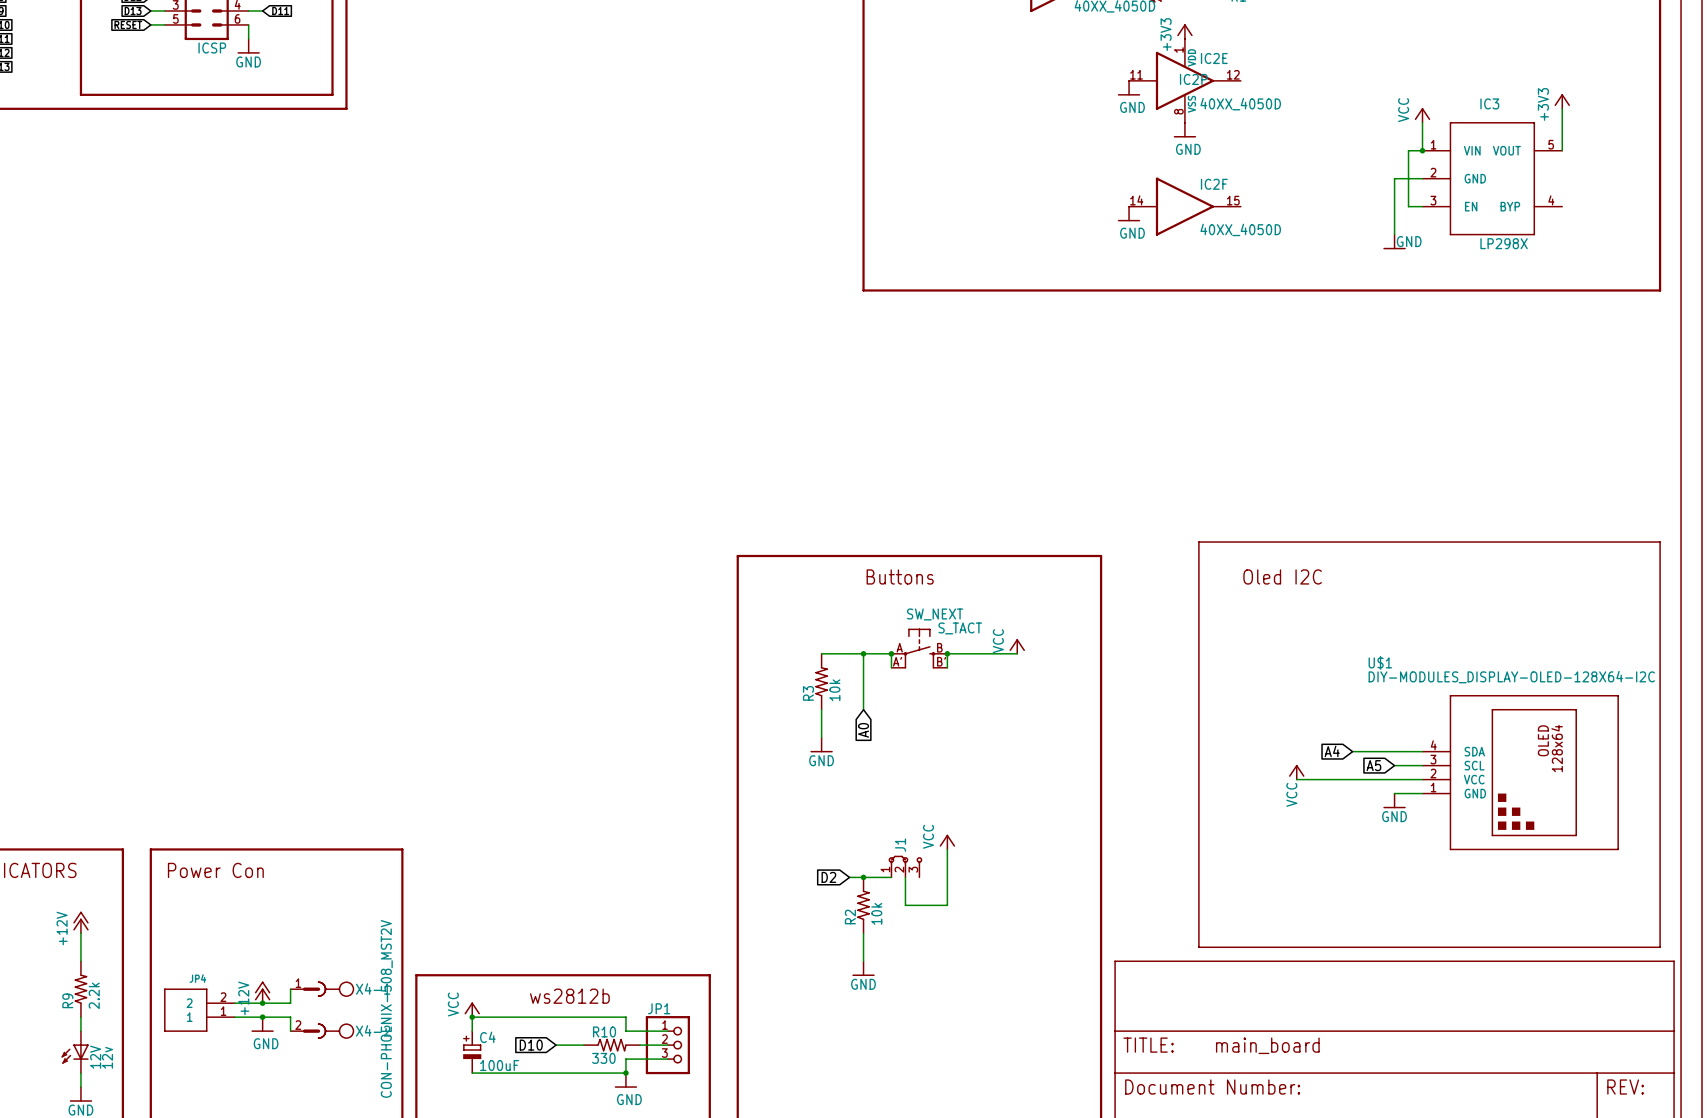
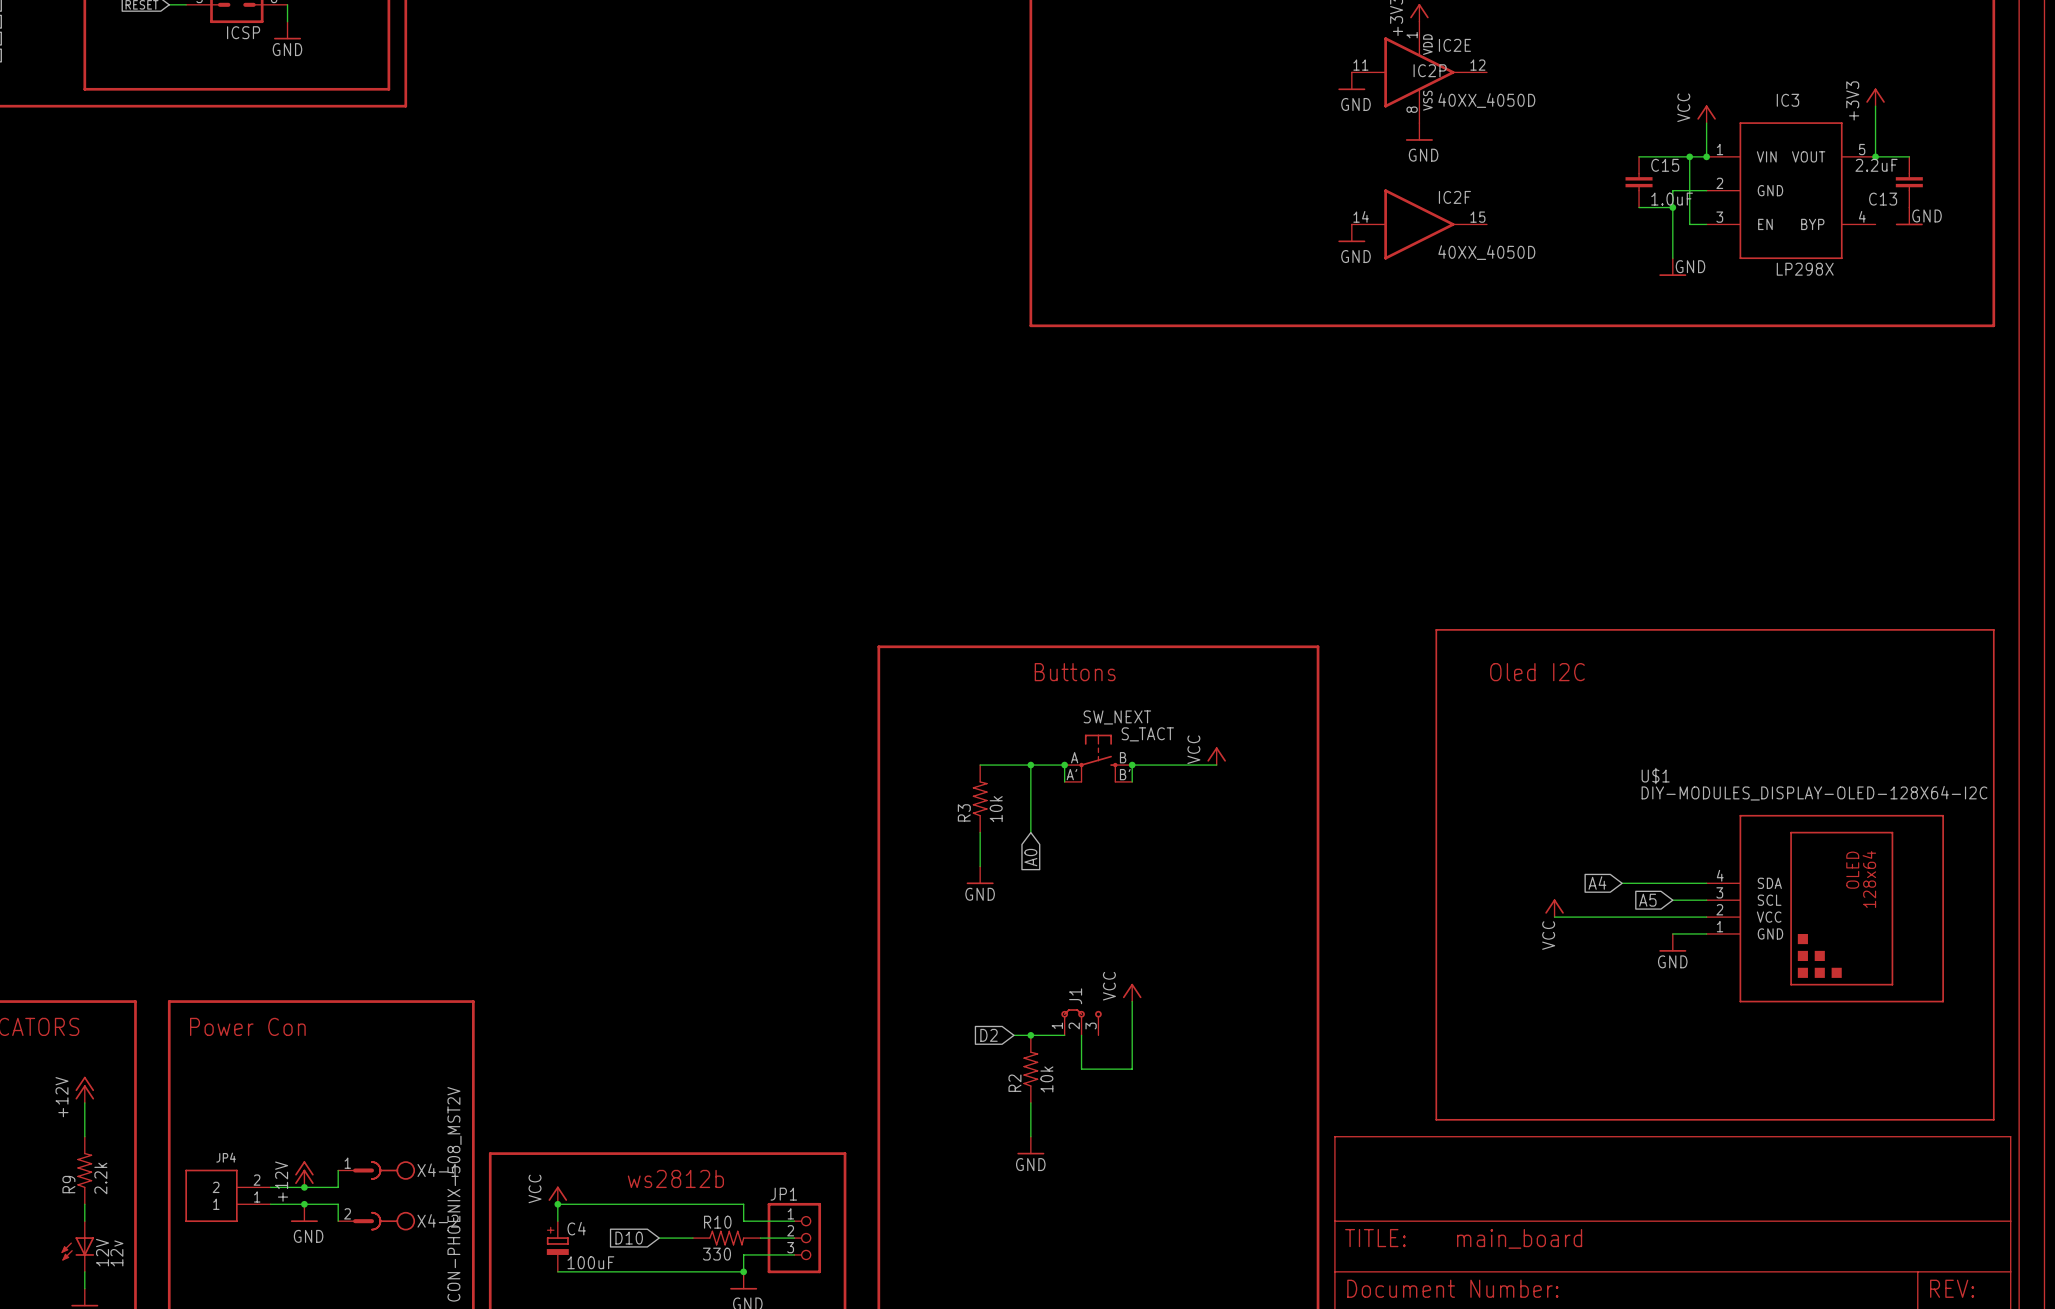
wire: none -> (1639, 156) (1689, 156)
junction: none -> (1689, 156)
wire: none -> (1875, 156) (1909, 156)
junction: none -> (1875, 156)
C15: none -> 1.0uF (1639, 182)
C13: none -> 2.2uF (1909, 182)
wire: none -> (1639, 207) (1672, 207)
junction: none -> (1672, 207)
power symbol: none -> GND (1909, 216)

